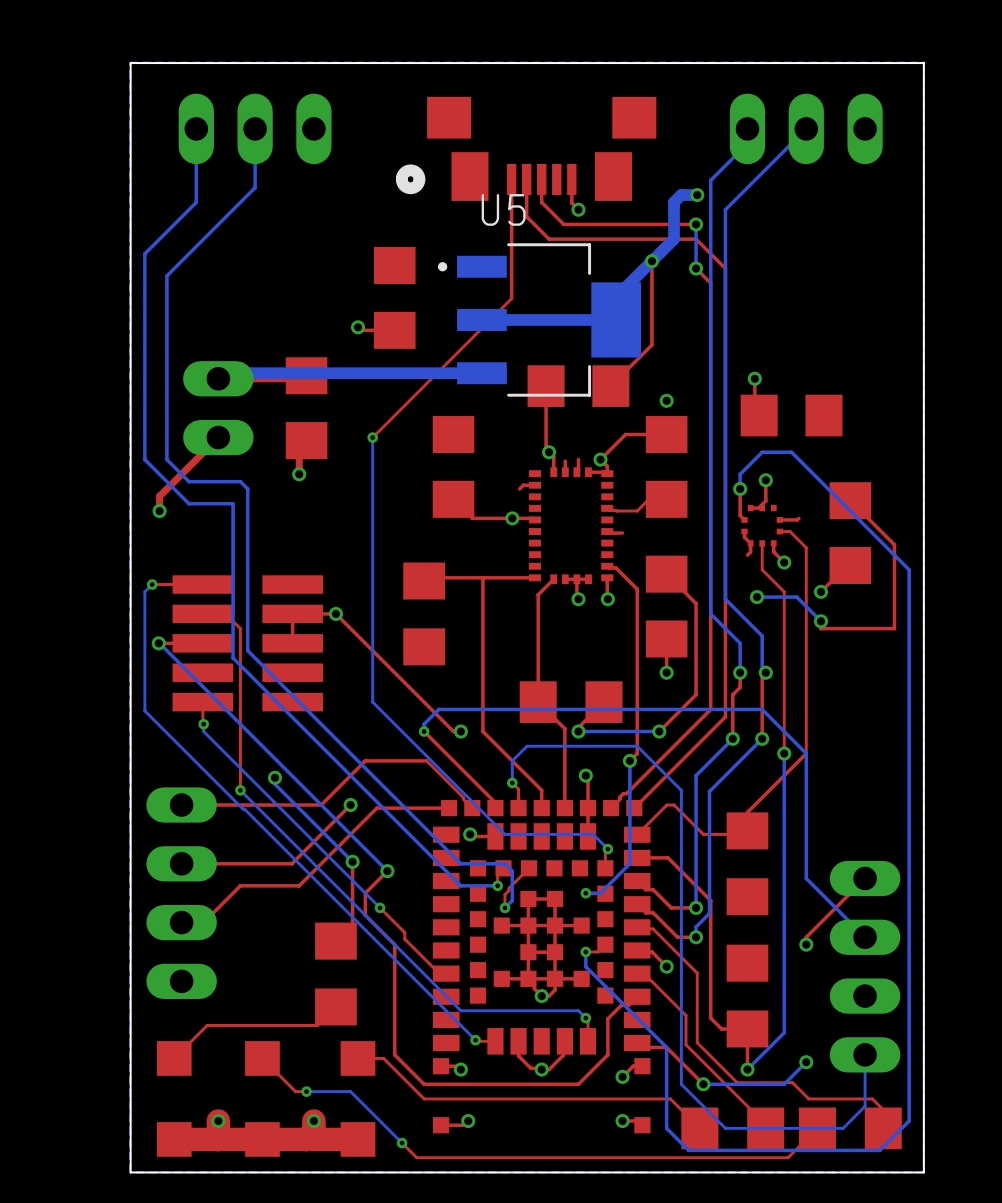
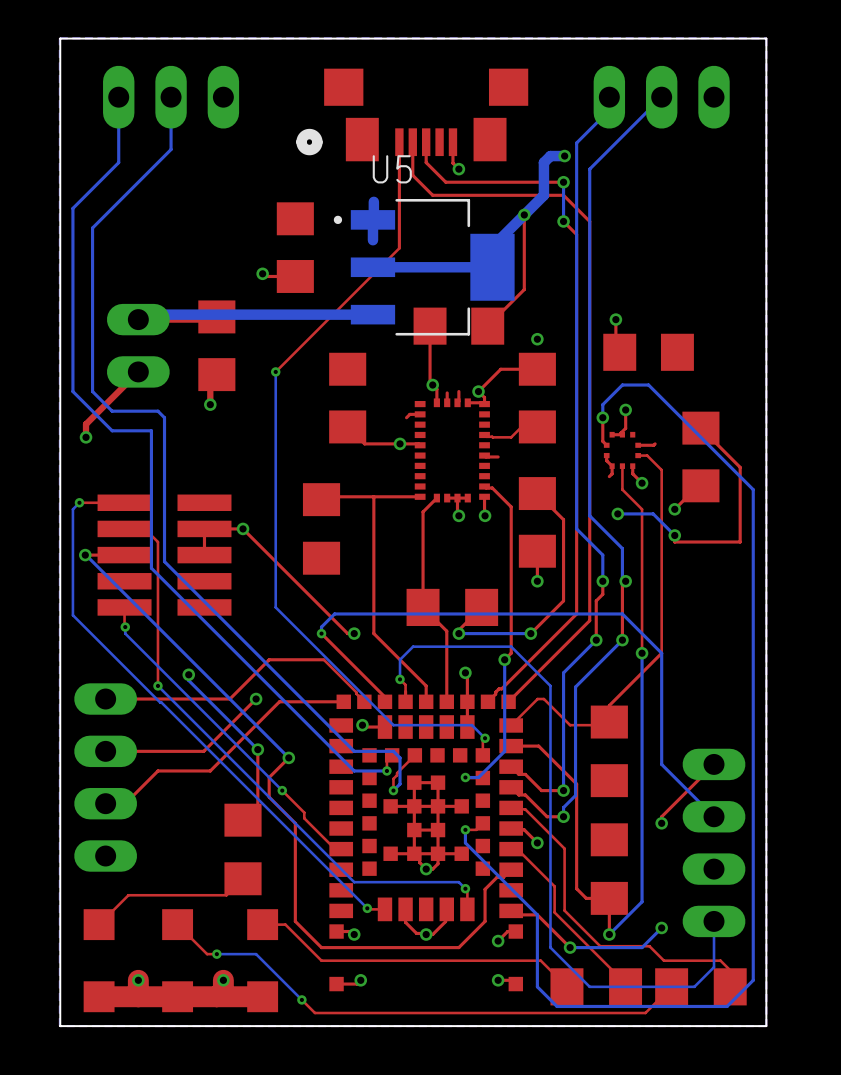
bottom track: none -> (373, 201) (373, 241)

